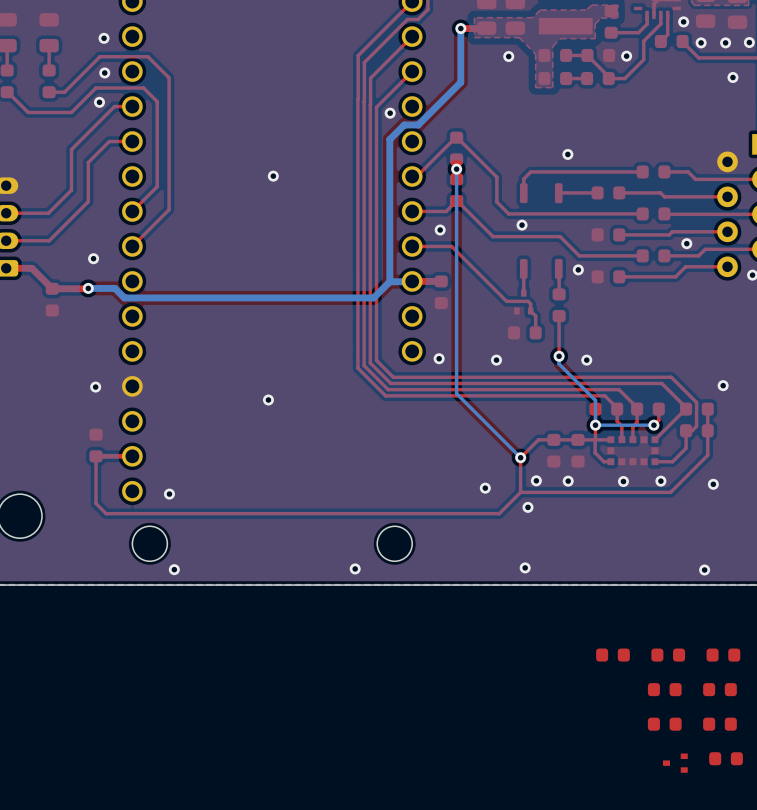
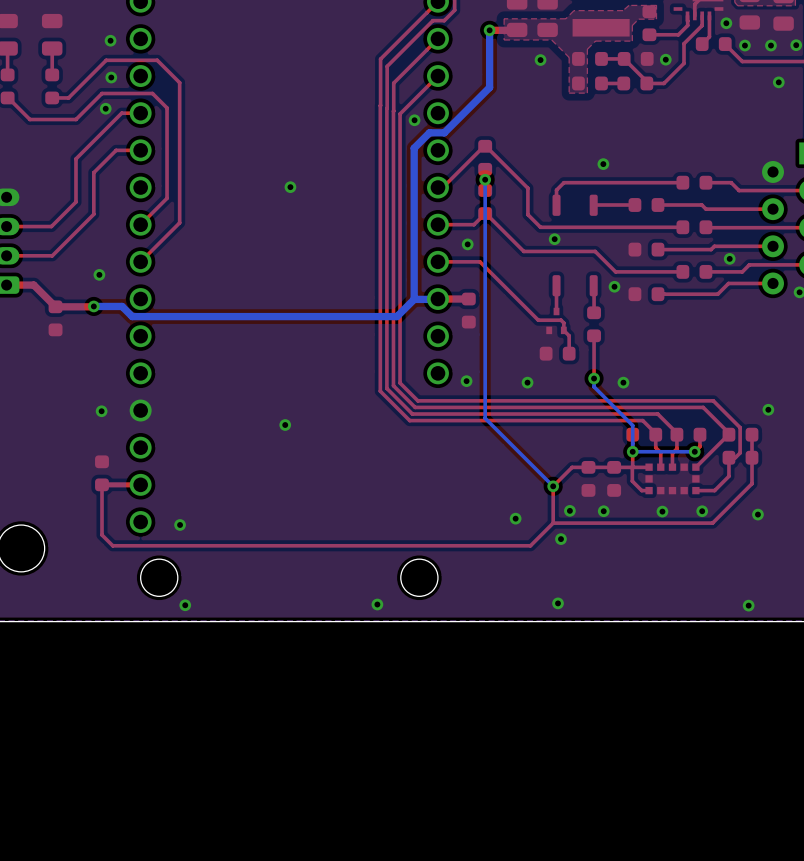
part: (612, 655) -> none
part: (668, 655) -> none
part: (723, 655) -> none
part: (664, 689) -> none
part: (719, 689) -> none
part: (664, 724) -> none
part: (719, 724) -> none
part: (726, 758) -> none
part: (675, 763) -> none

